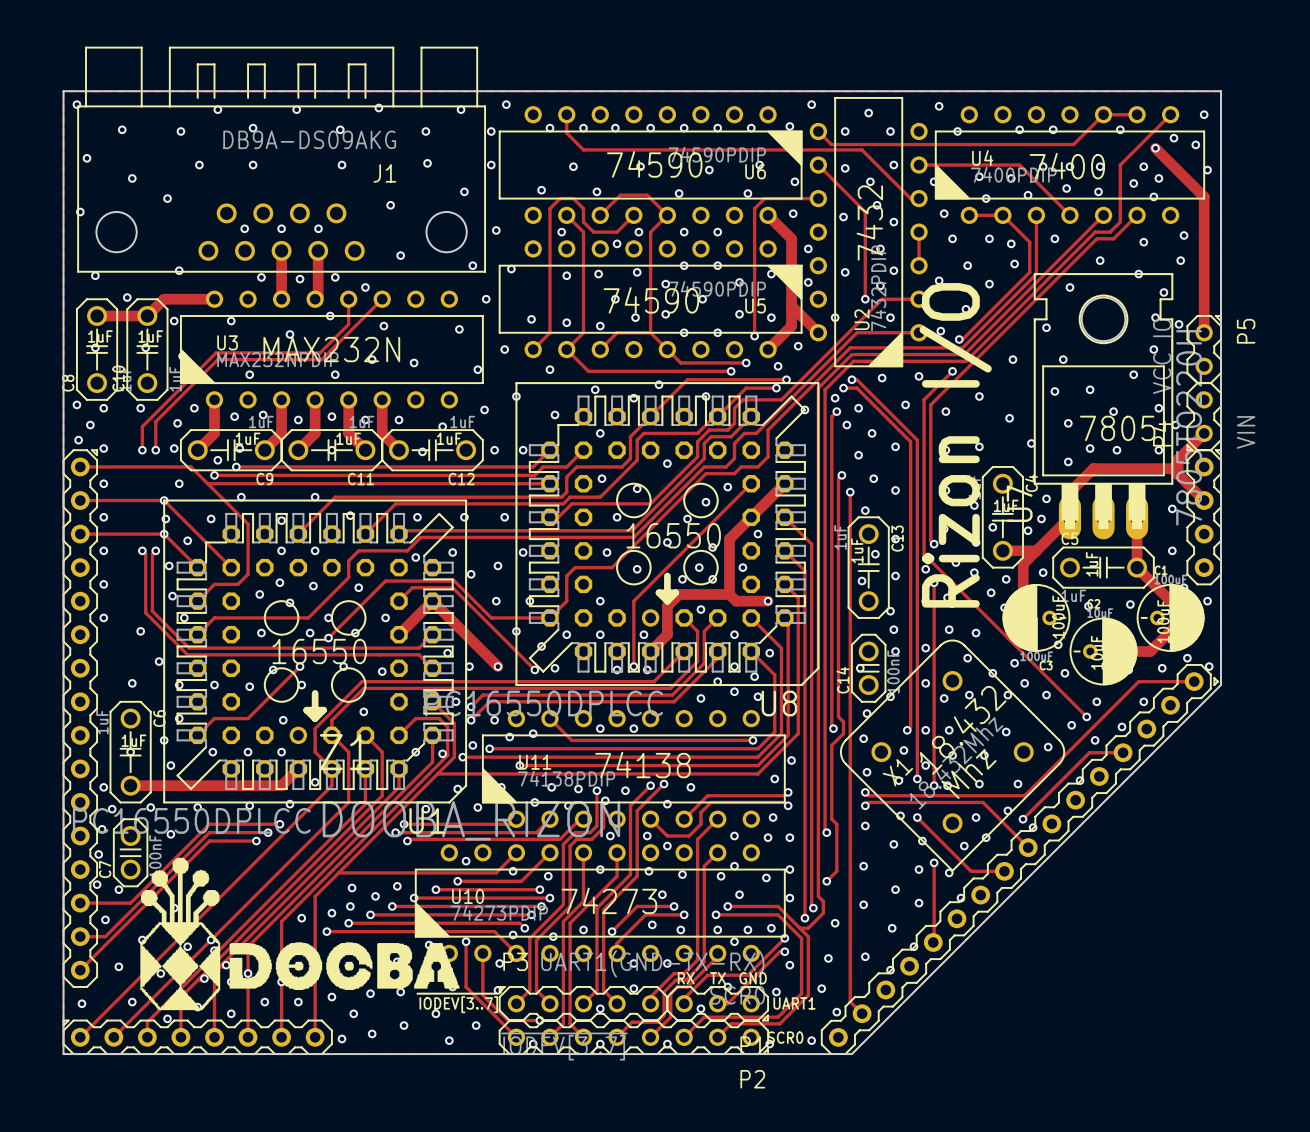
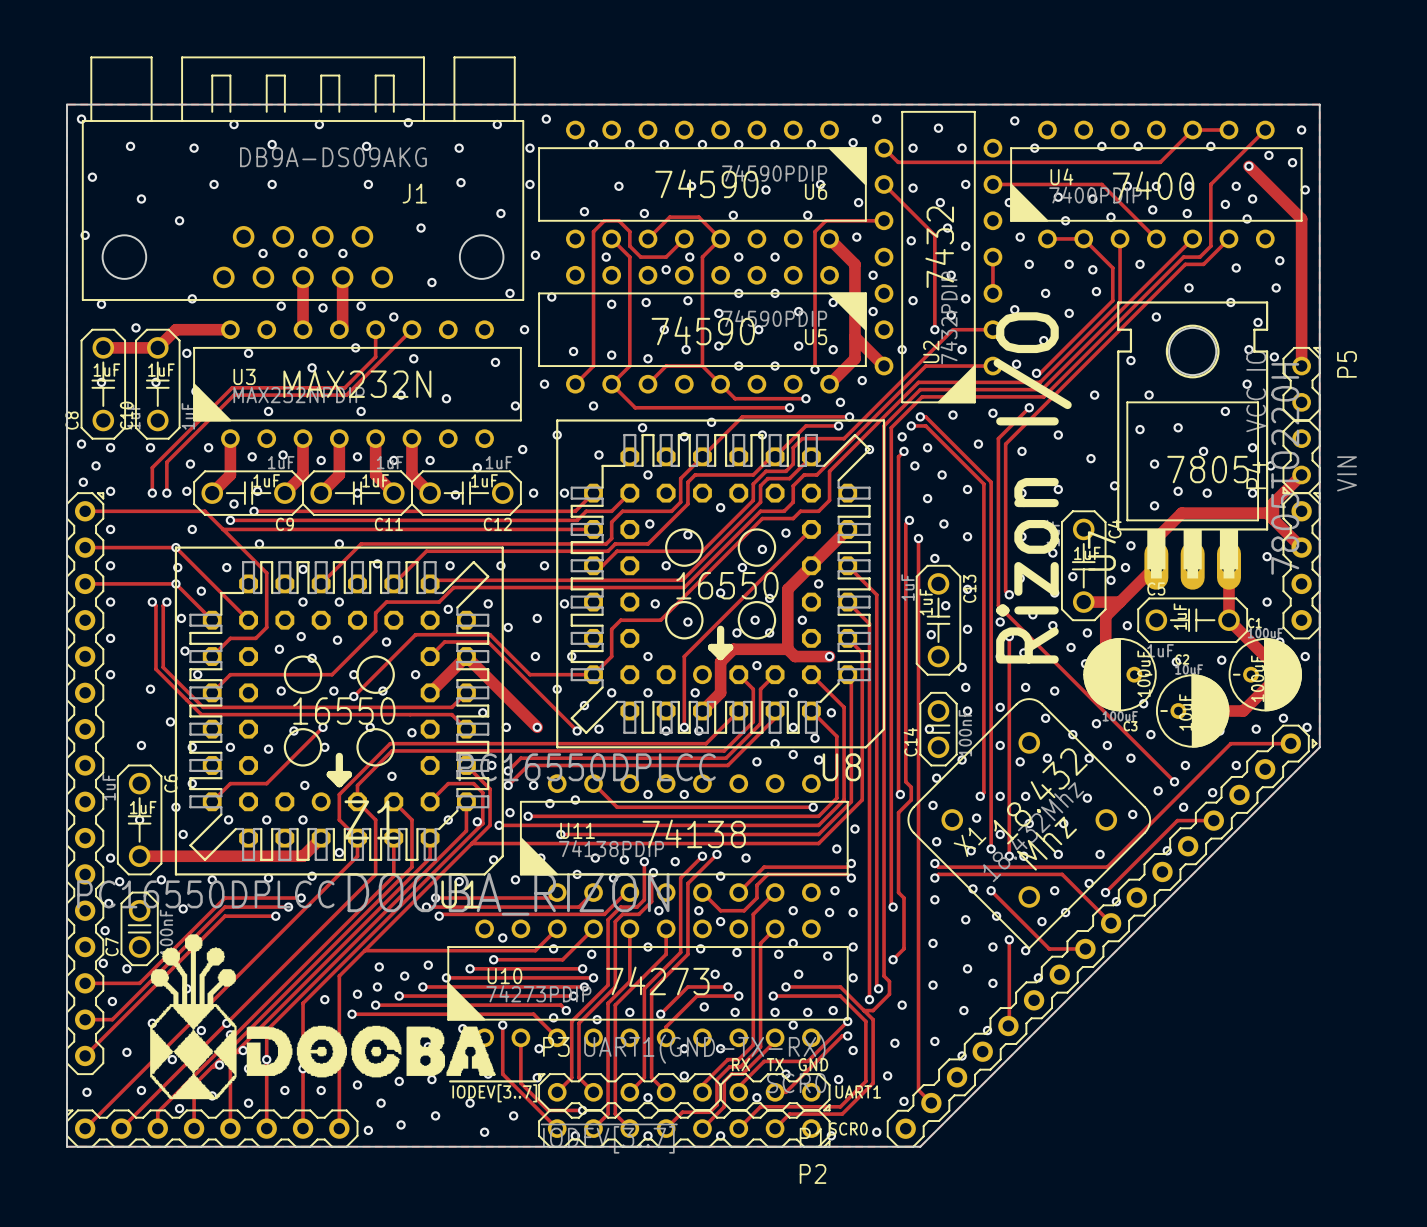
track: (566, 114) (566, 133) (583, 149) (861, 149) (910, 198) (919, 198) -> none

